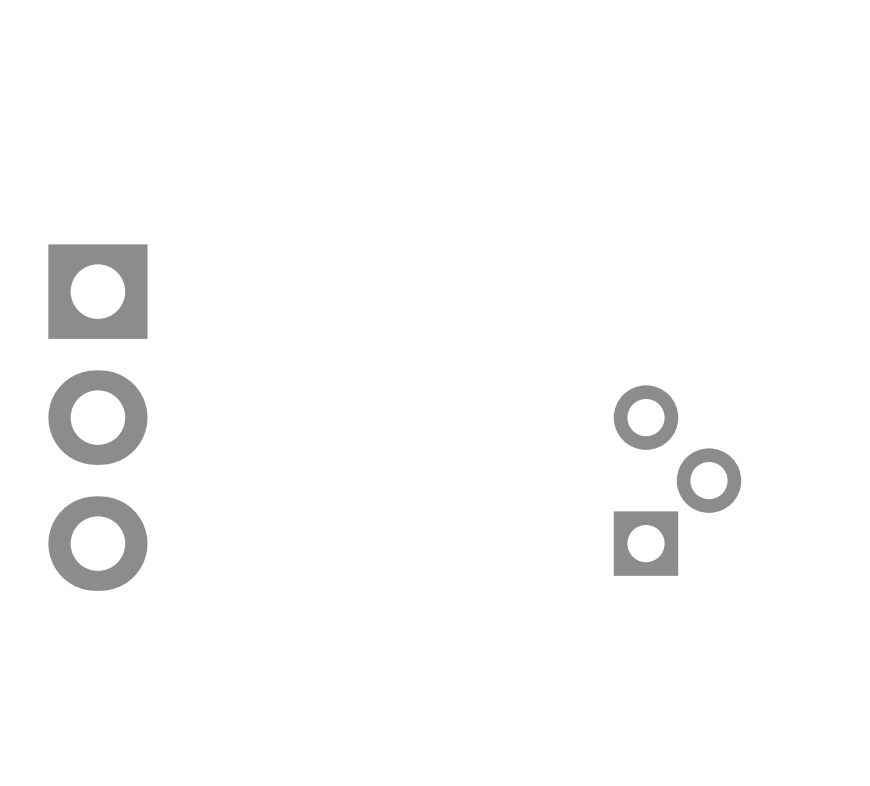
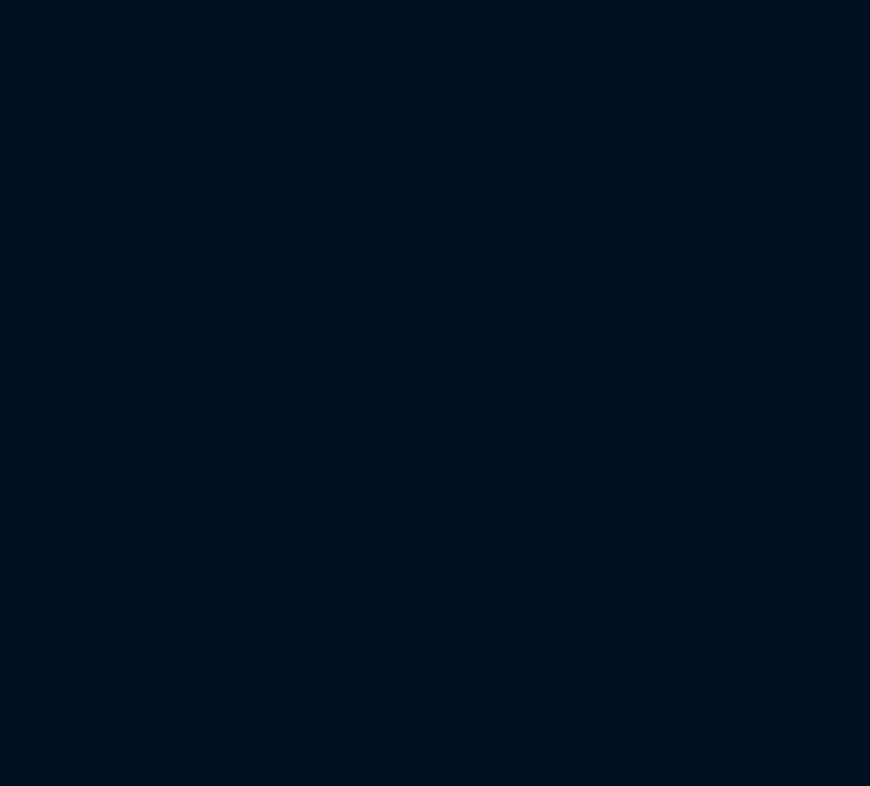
part: (97, 417) -> none
part: (677, 480) -> none

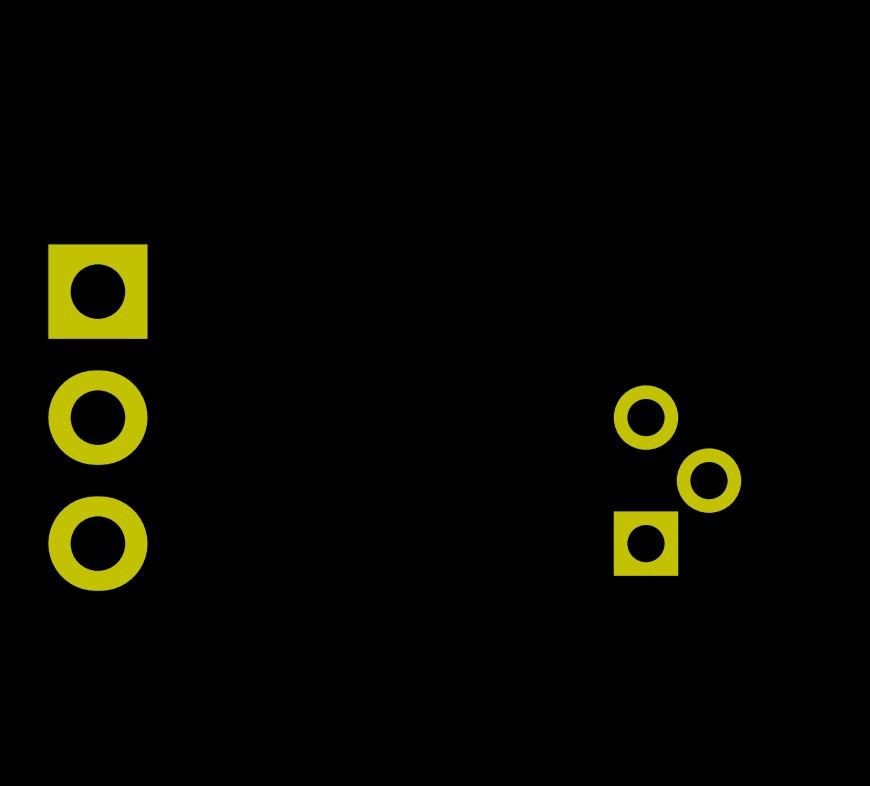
part: none -> (97, 417)
part: none -> (677, 480)

